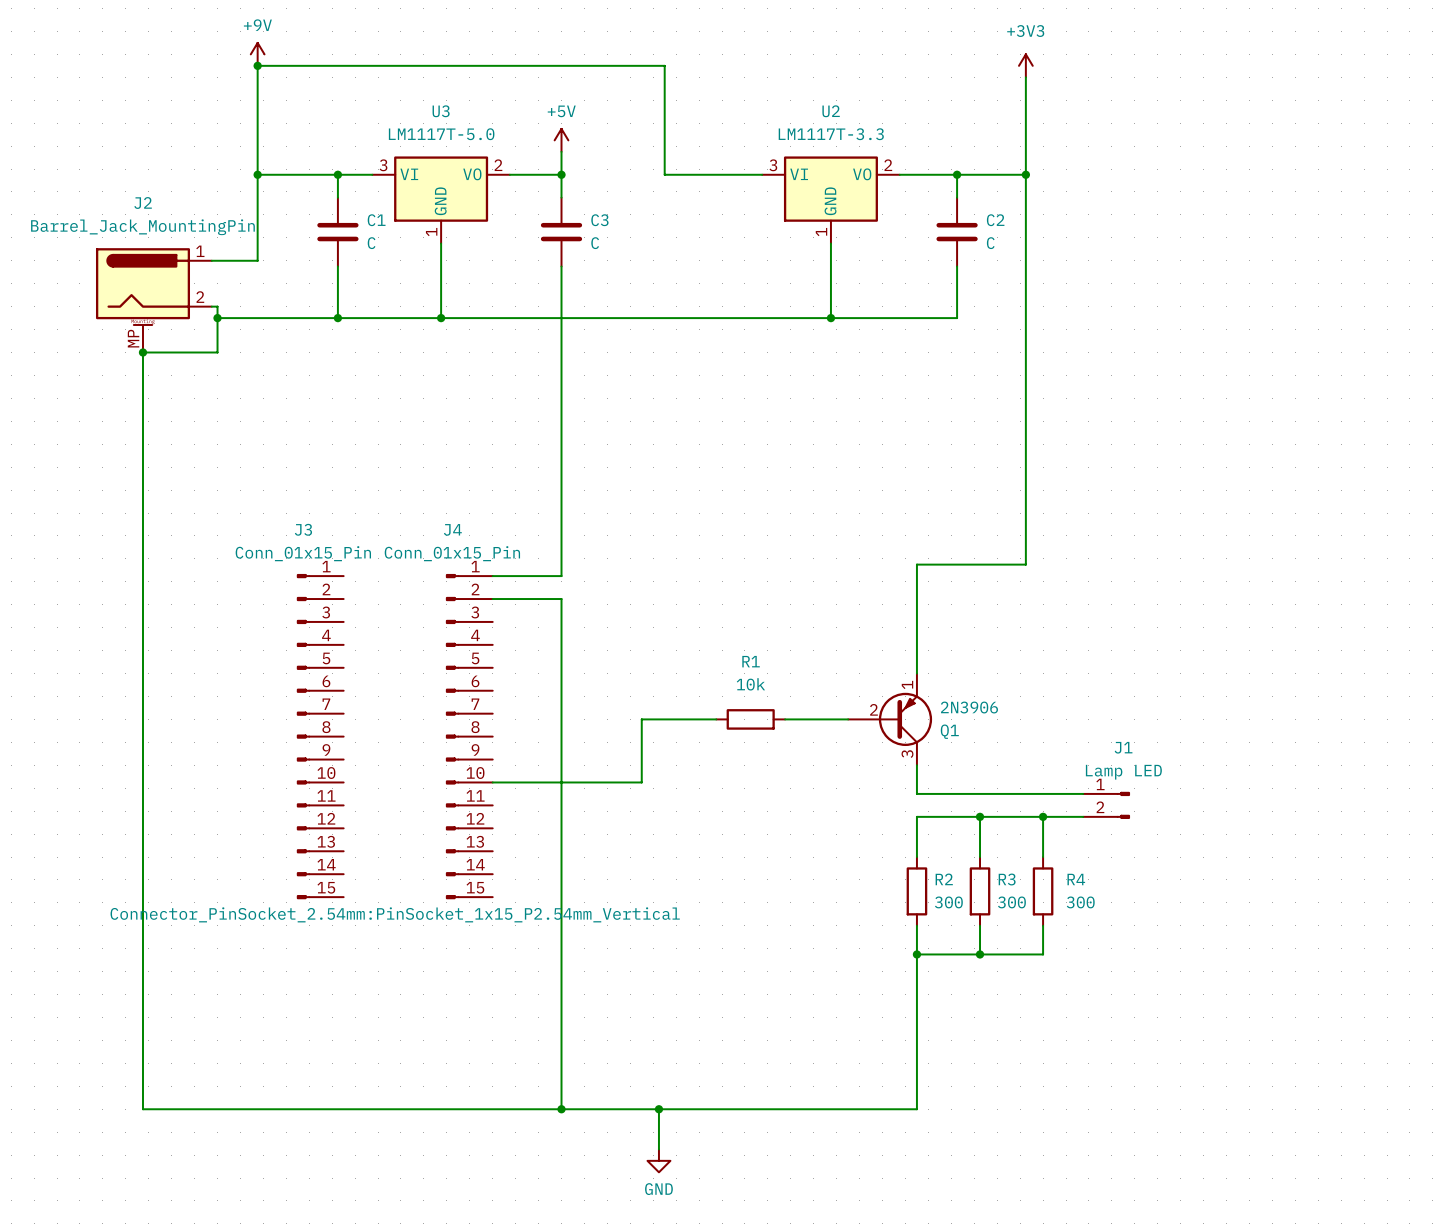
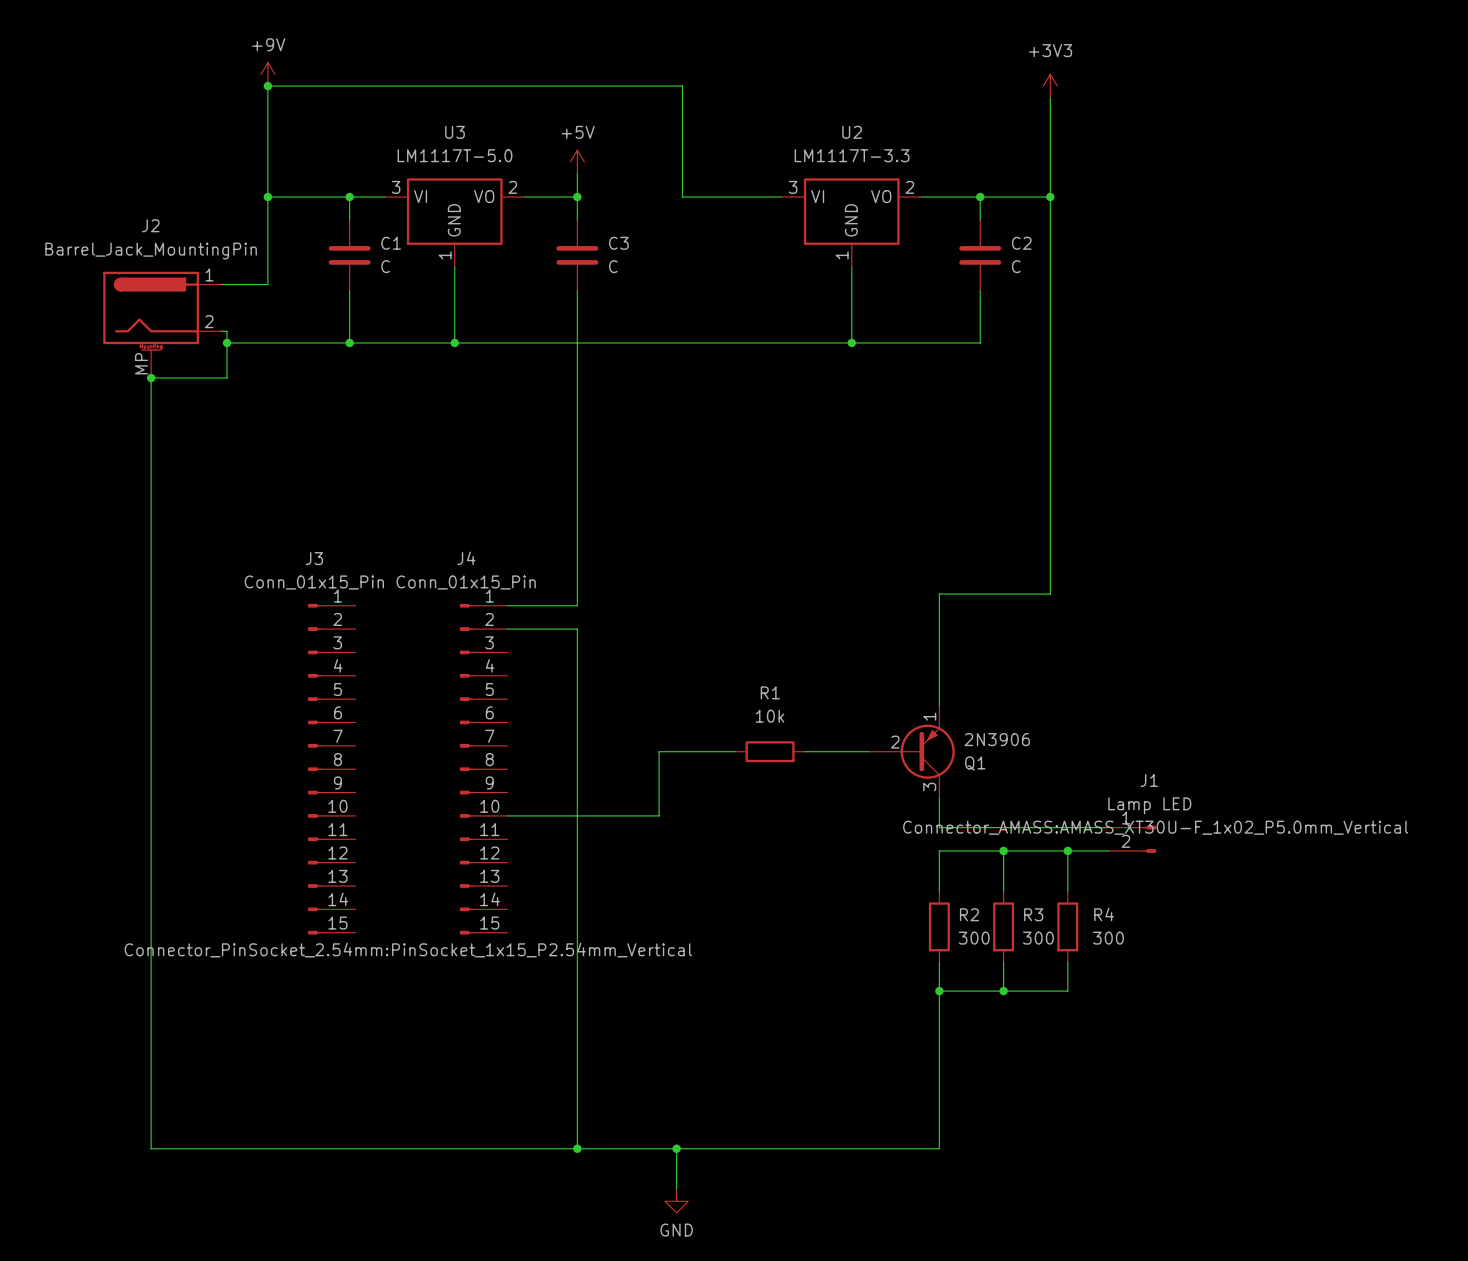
J1 text: none -> Connector_AMASS:AMASS_XT30U-F_1x02_P5.0mm_Vertical (1155, 827)

